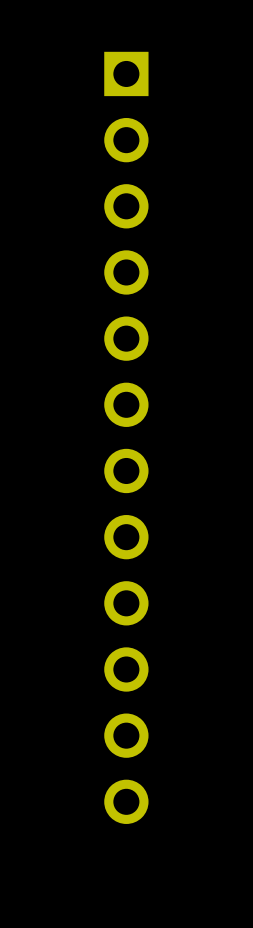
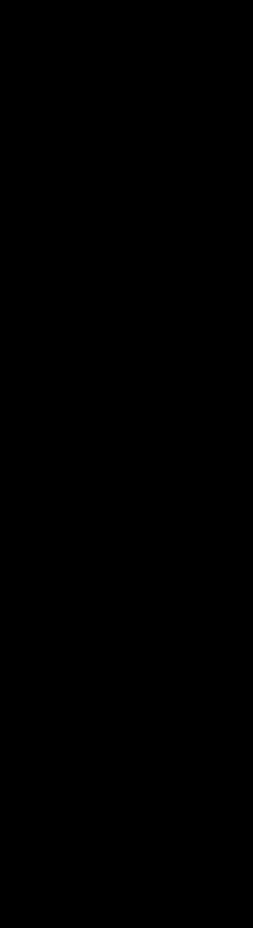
part: (126, 437) -> none

